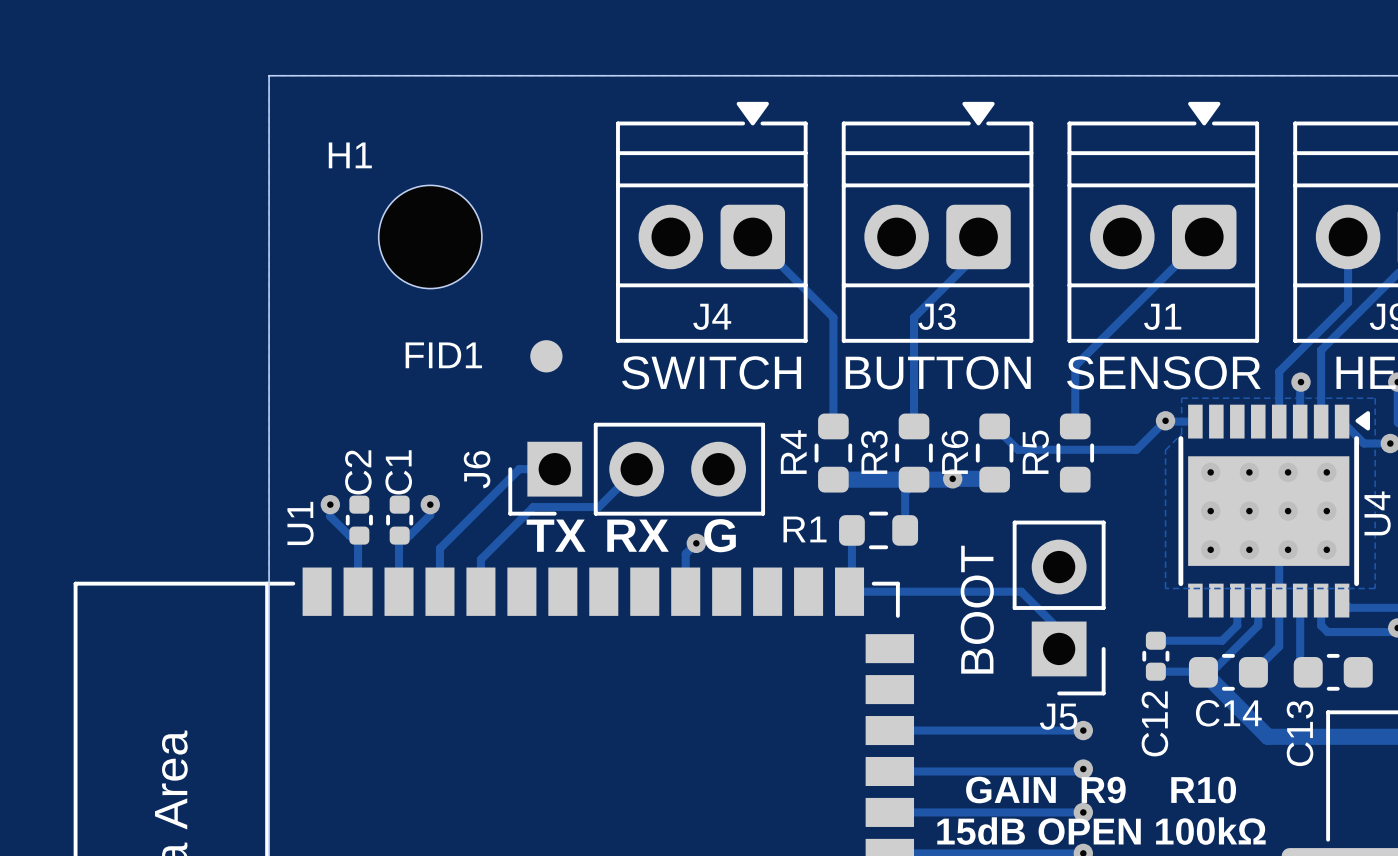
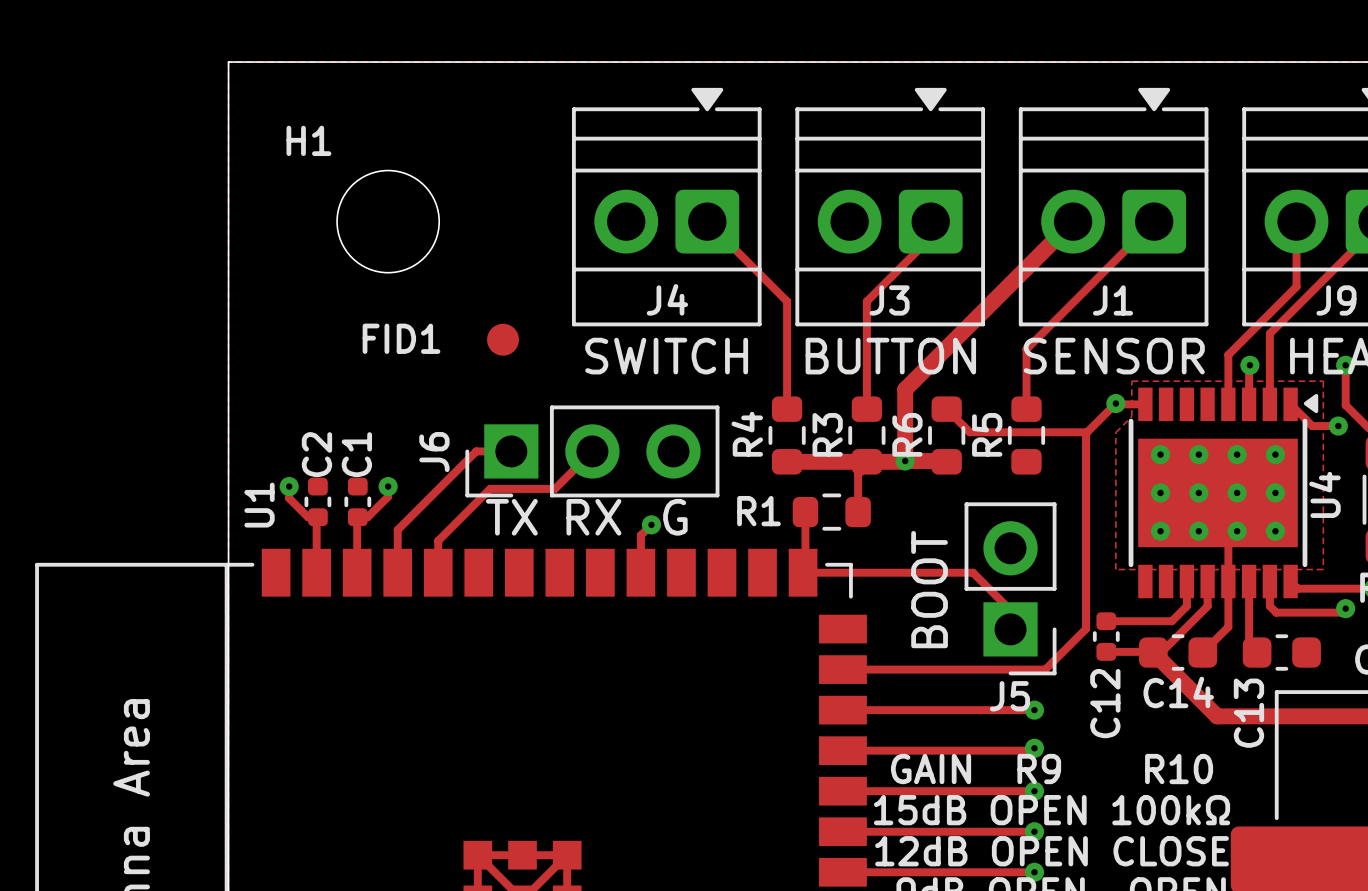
track: none -> (1073, 221) (905, 389) (905, 461)
track: none -> (1087, 432) (1086, 628) (1045, 669) (842, 669)

